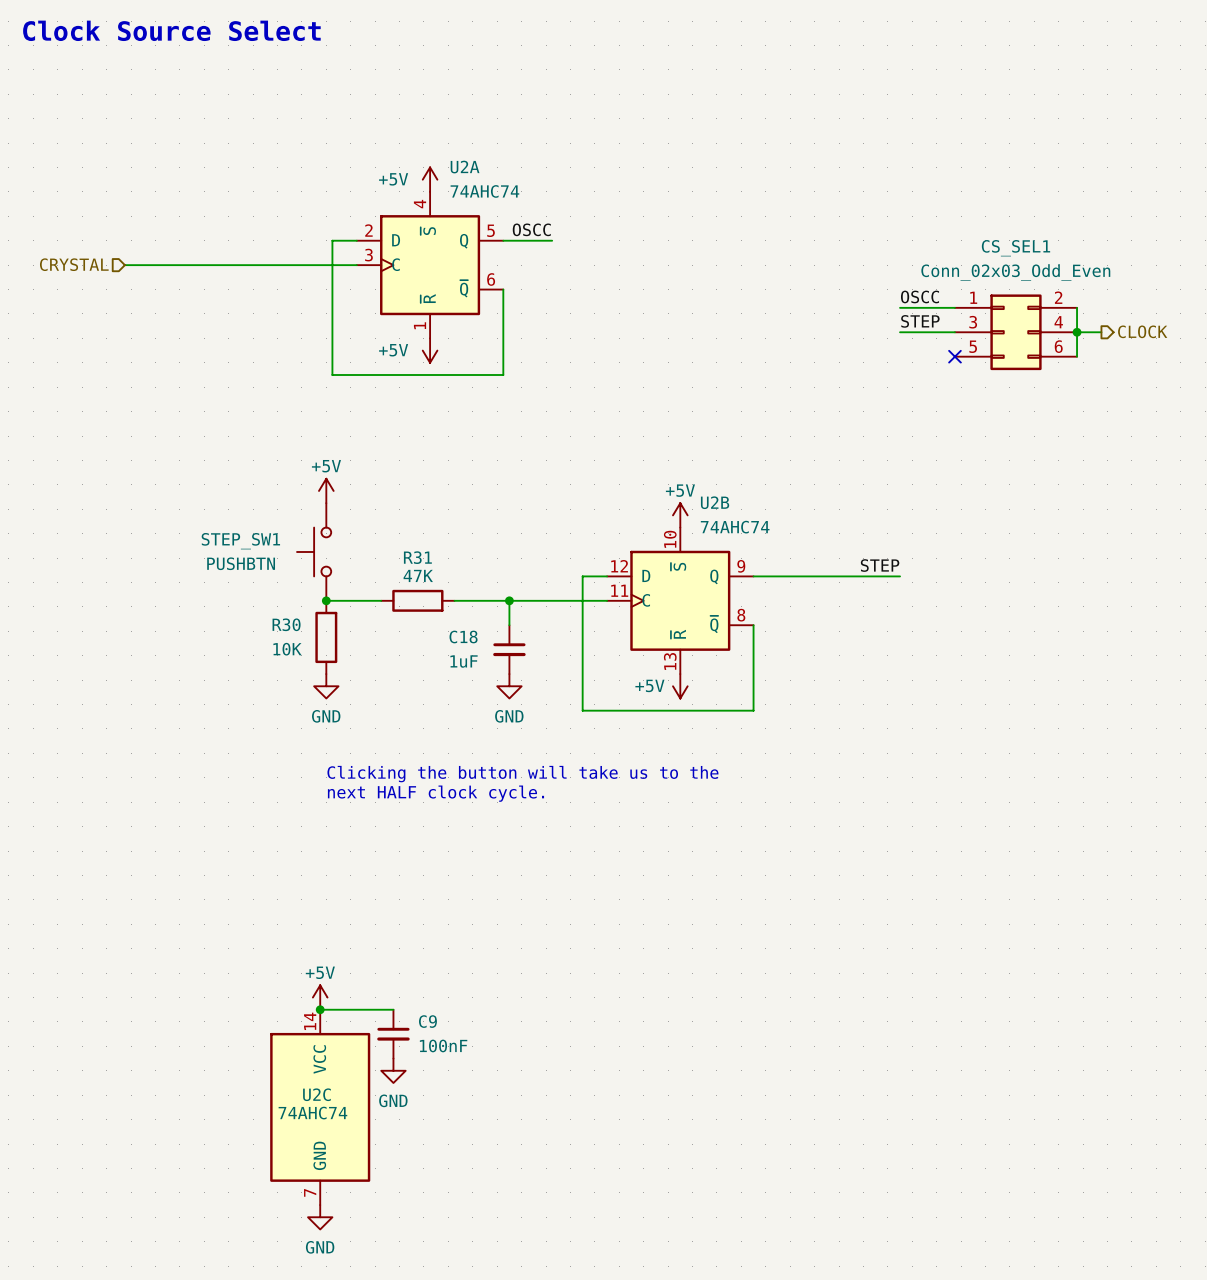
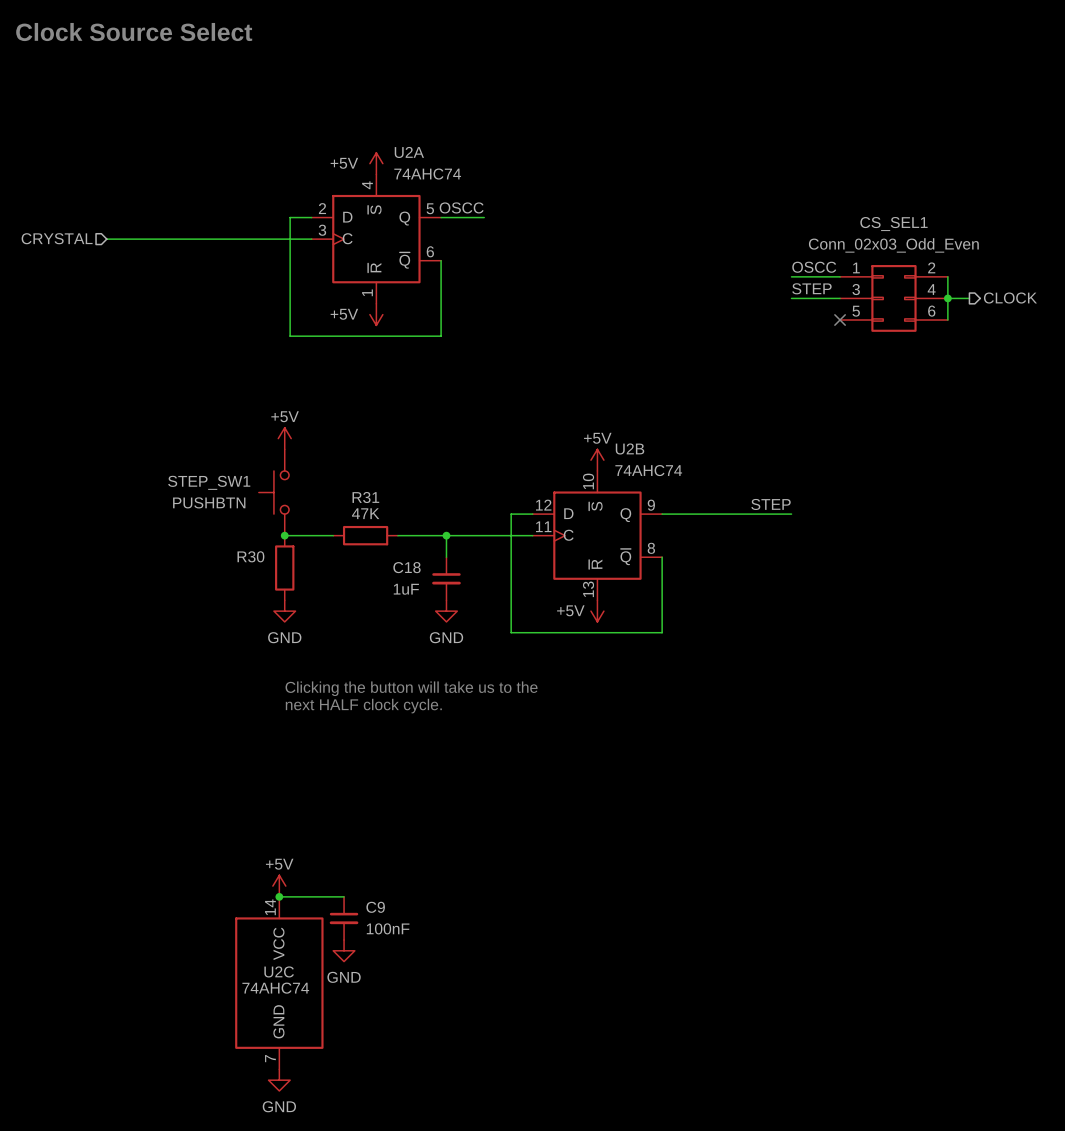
R30 value: 10K (287, 649) -> none

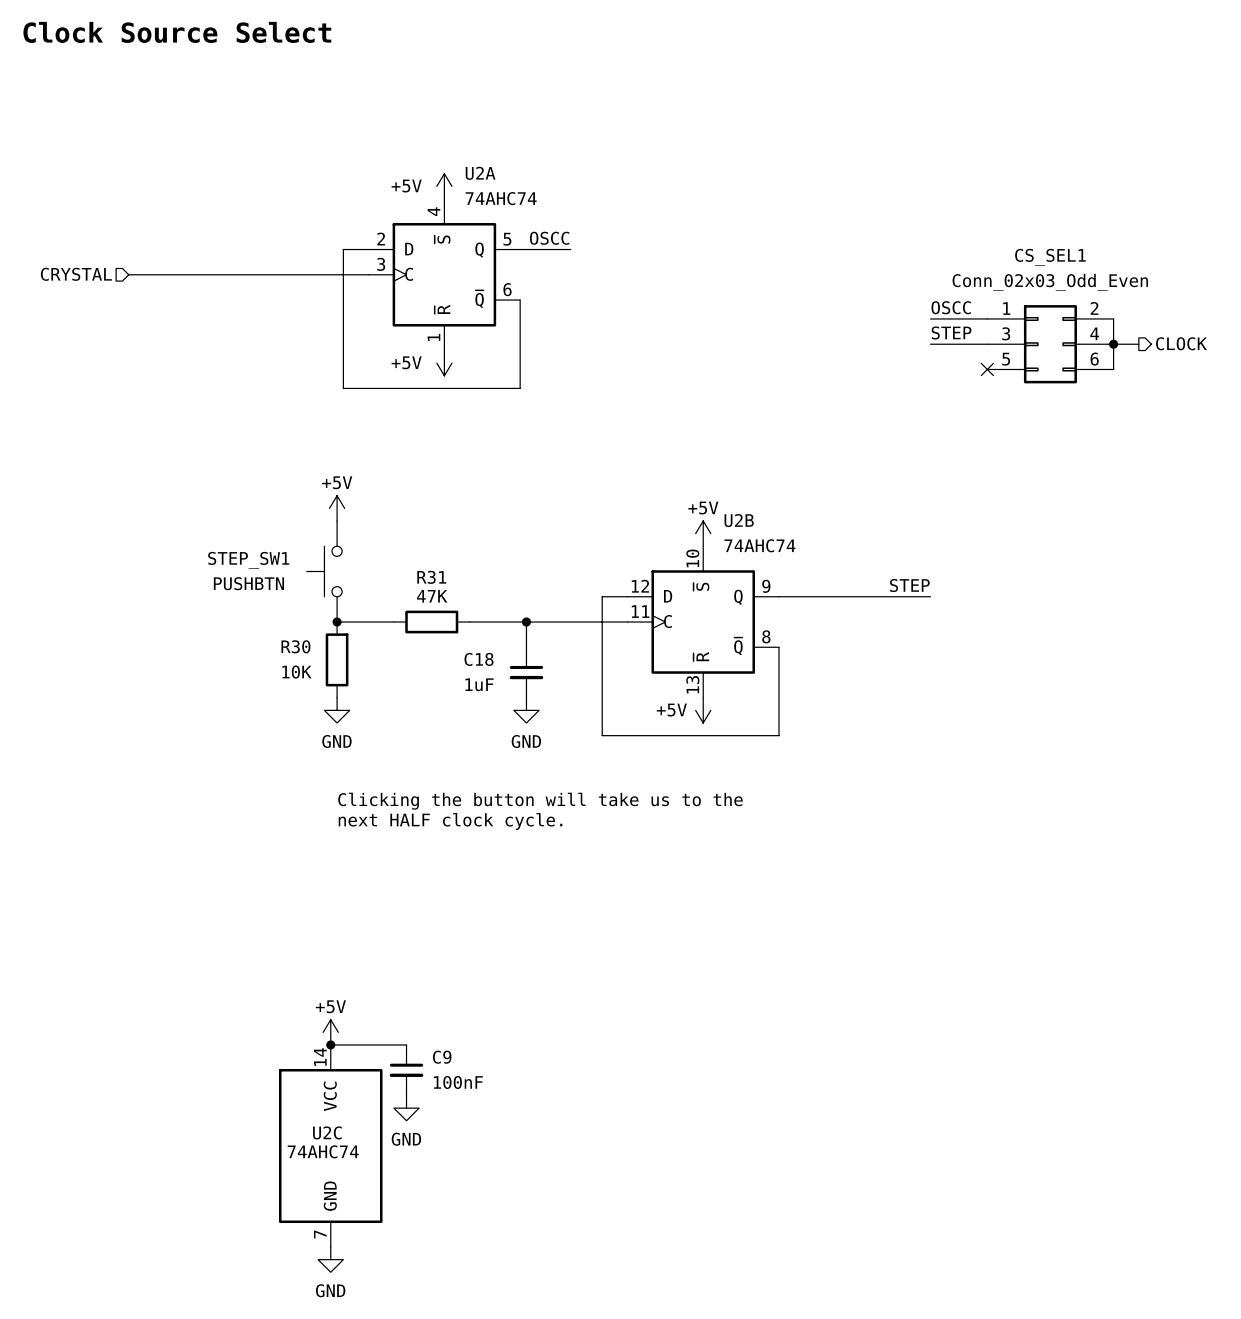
R30 value: none -> 10K (296, 672)

